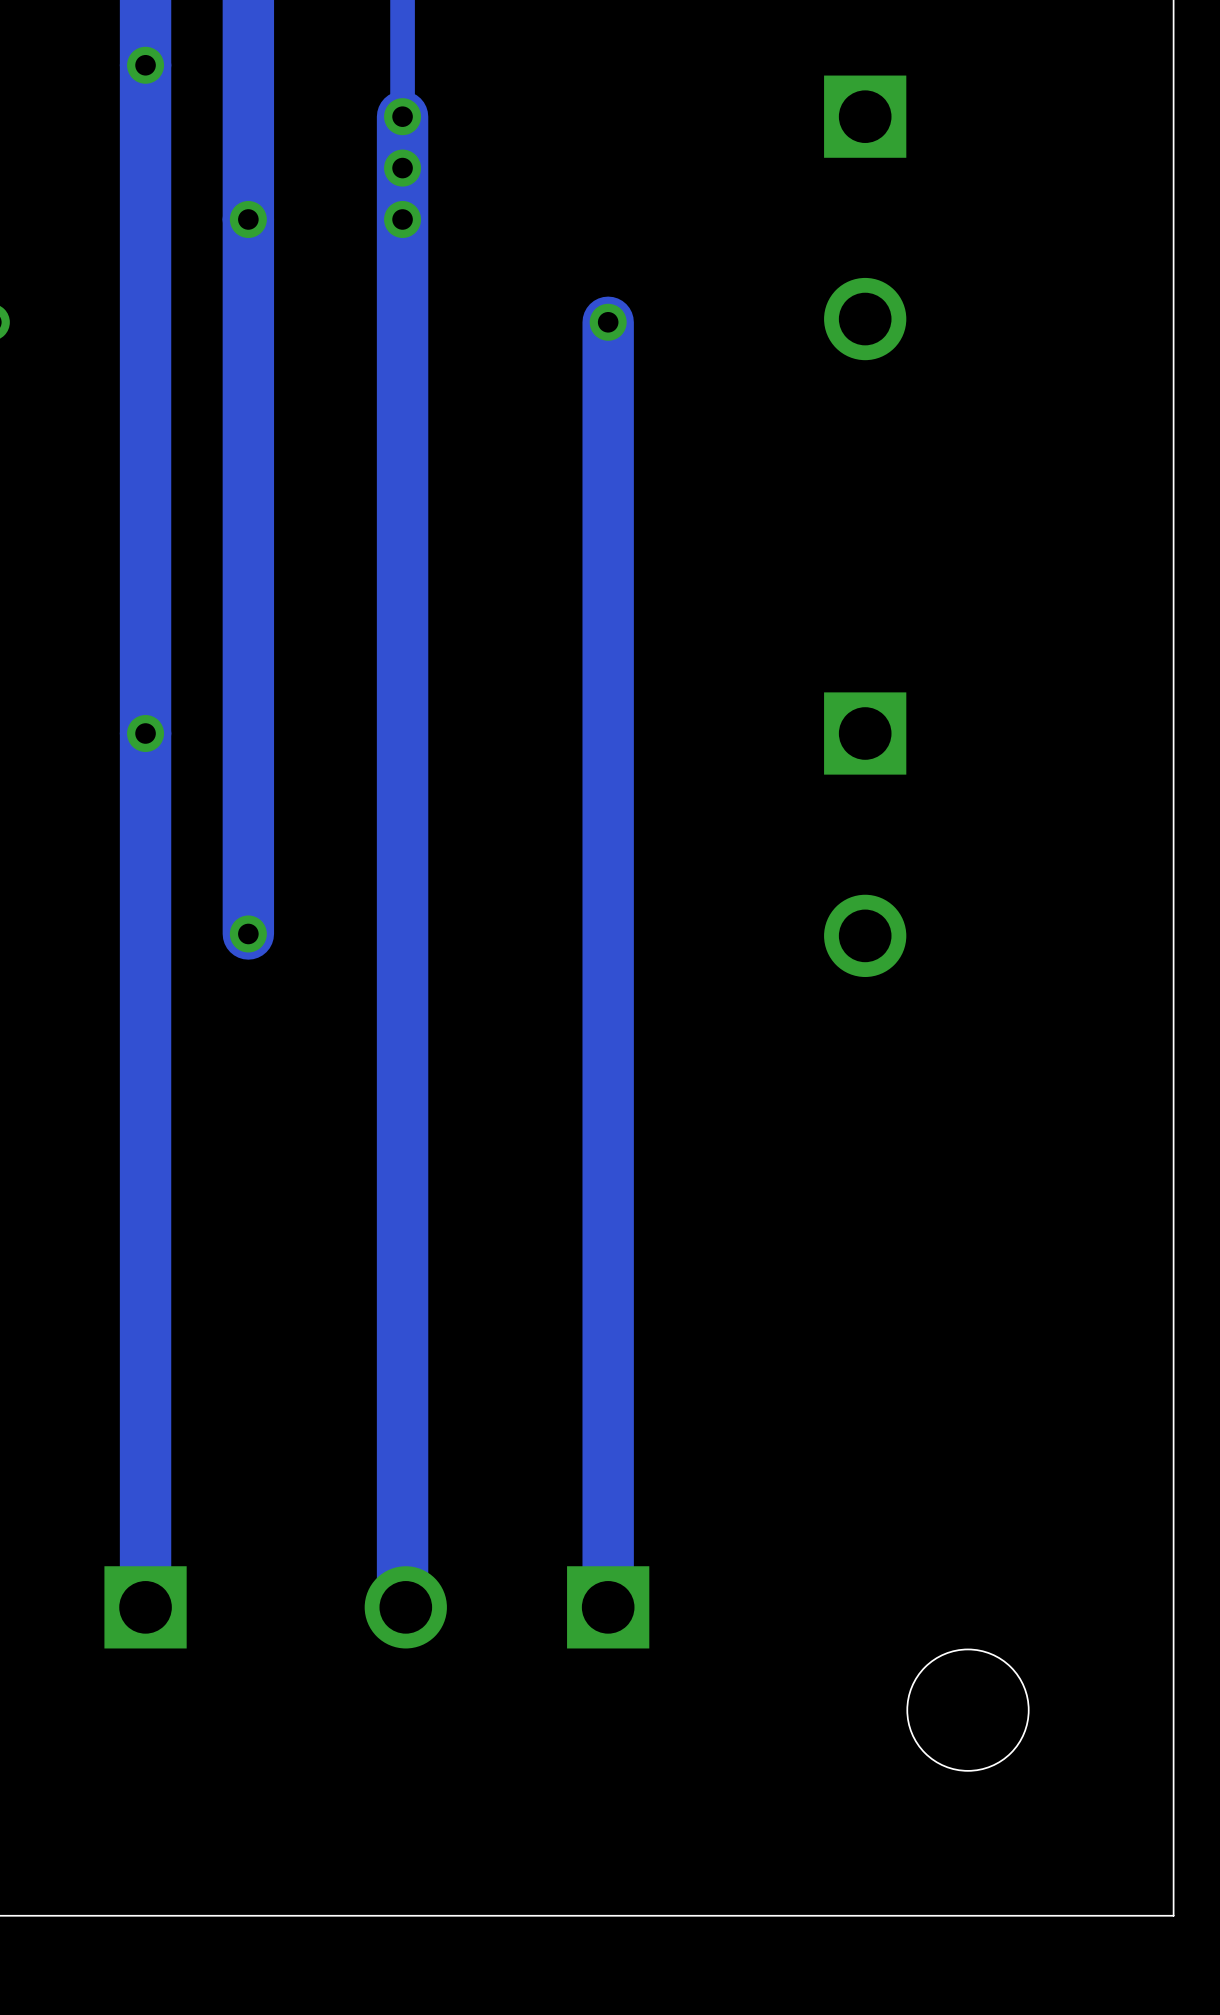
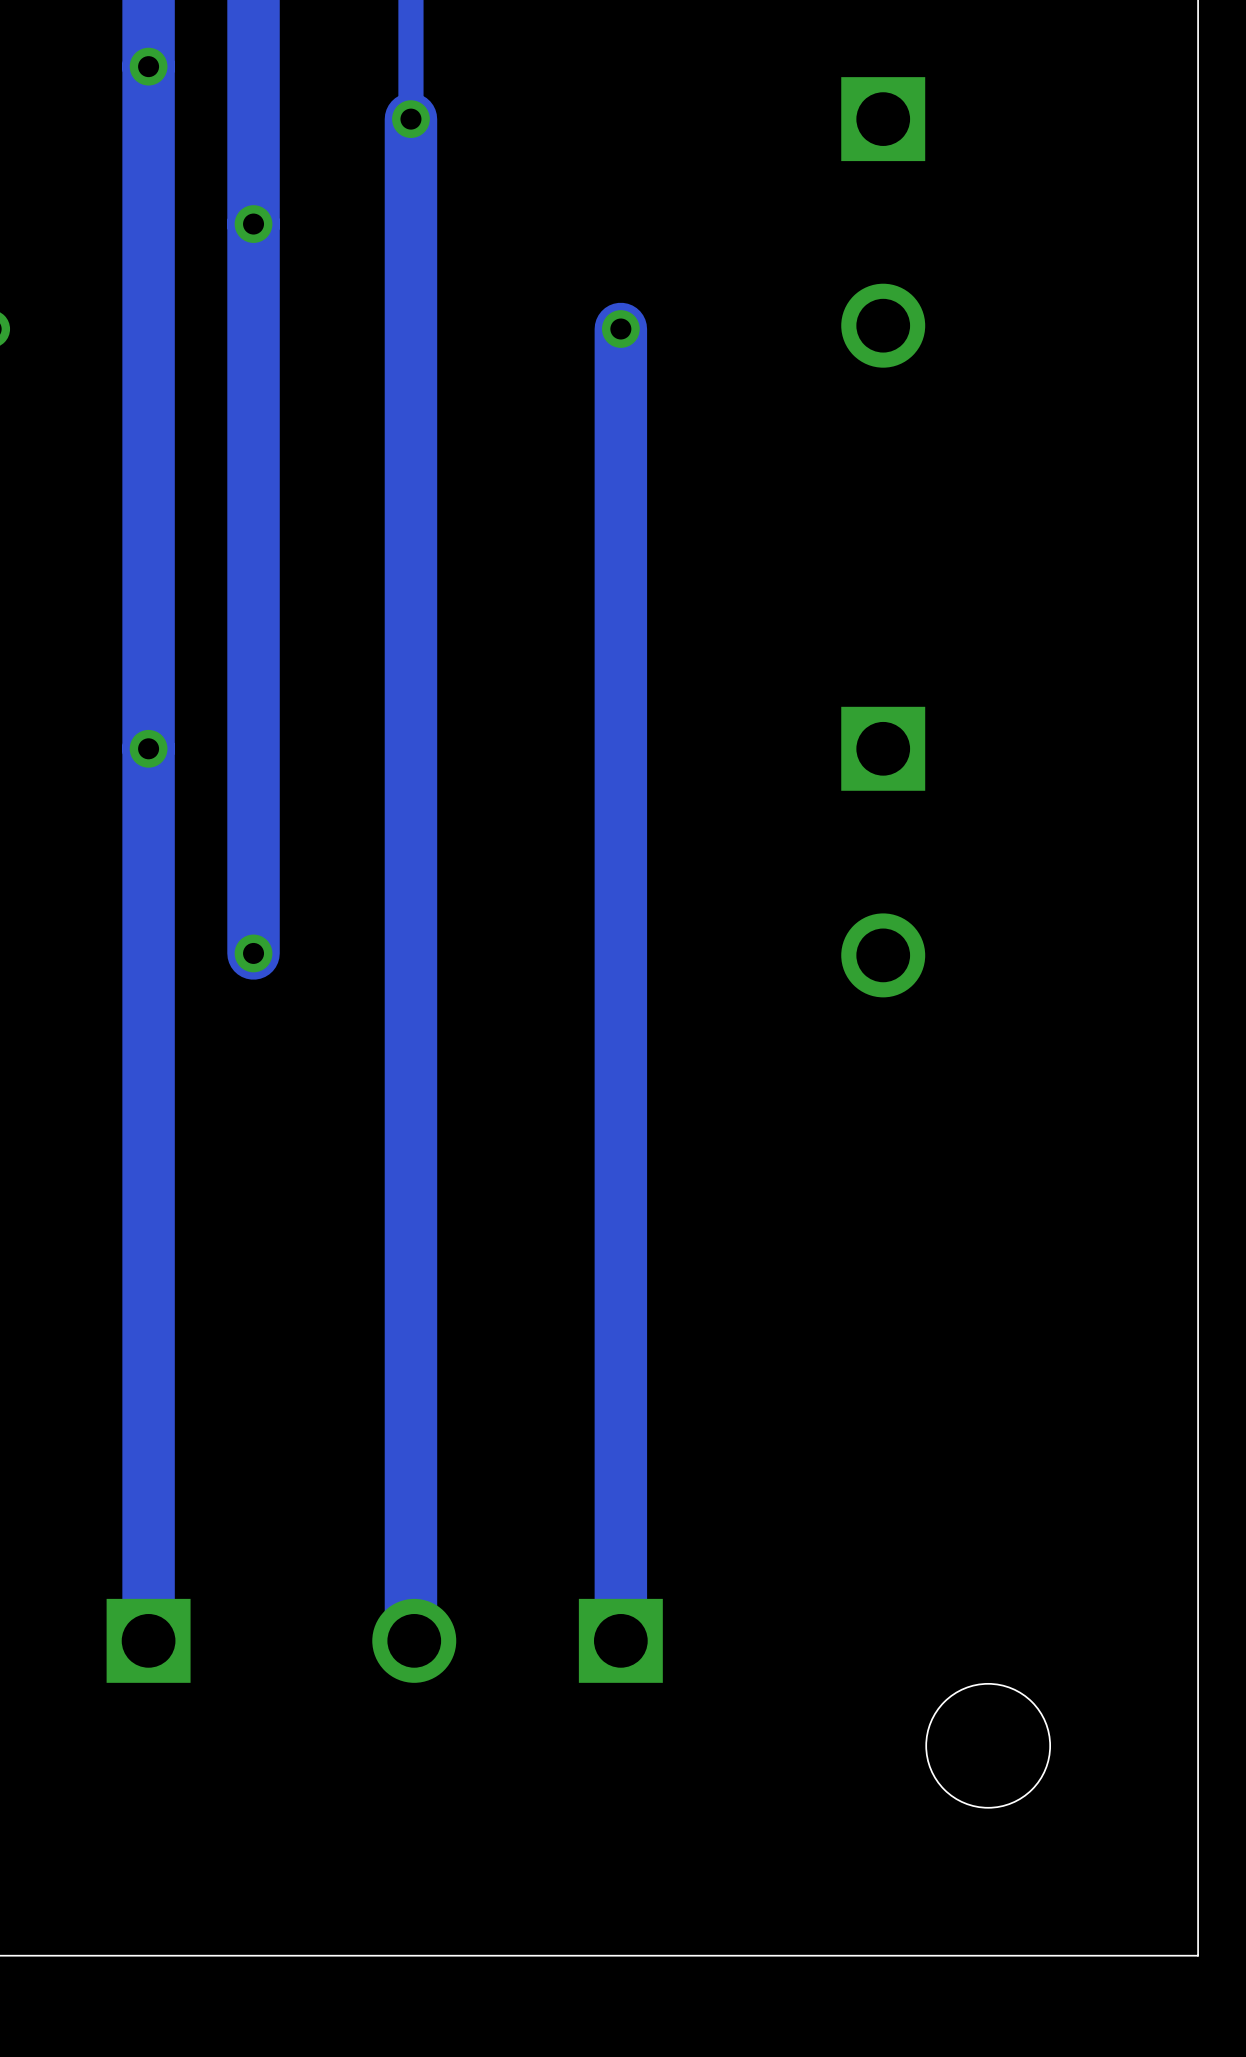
via: (402, 168) -> none
via: (402, 219) -> none

